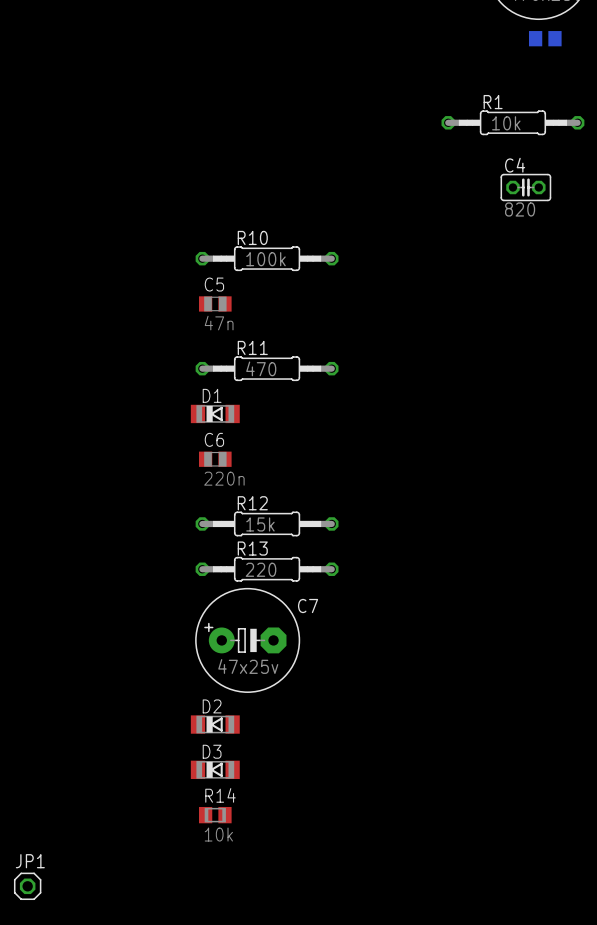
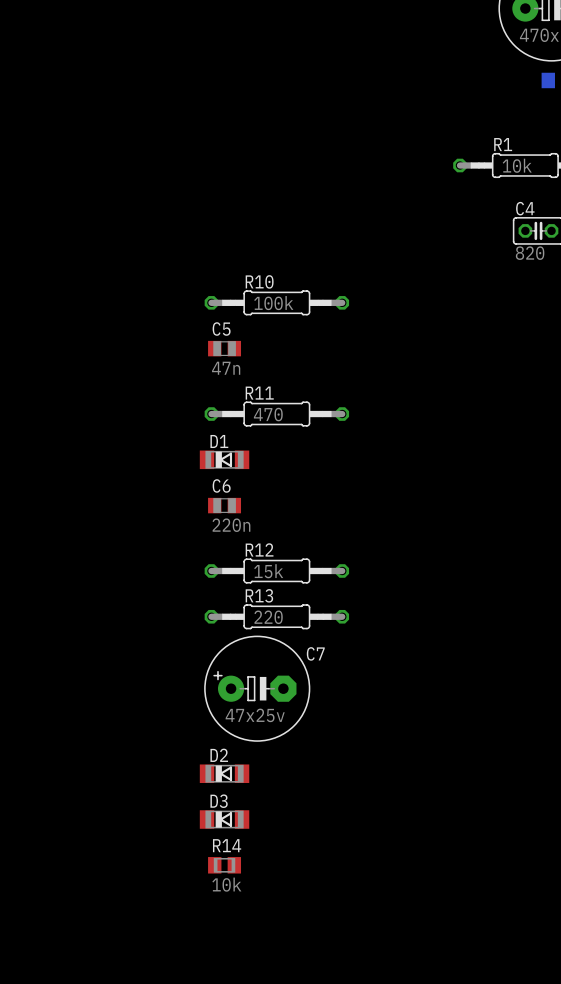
JP1: (27, 886) -> none

